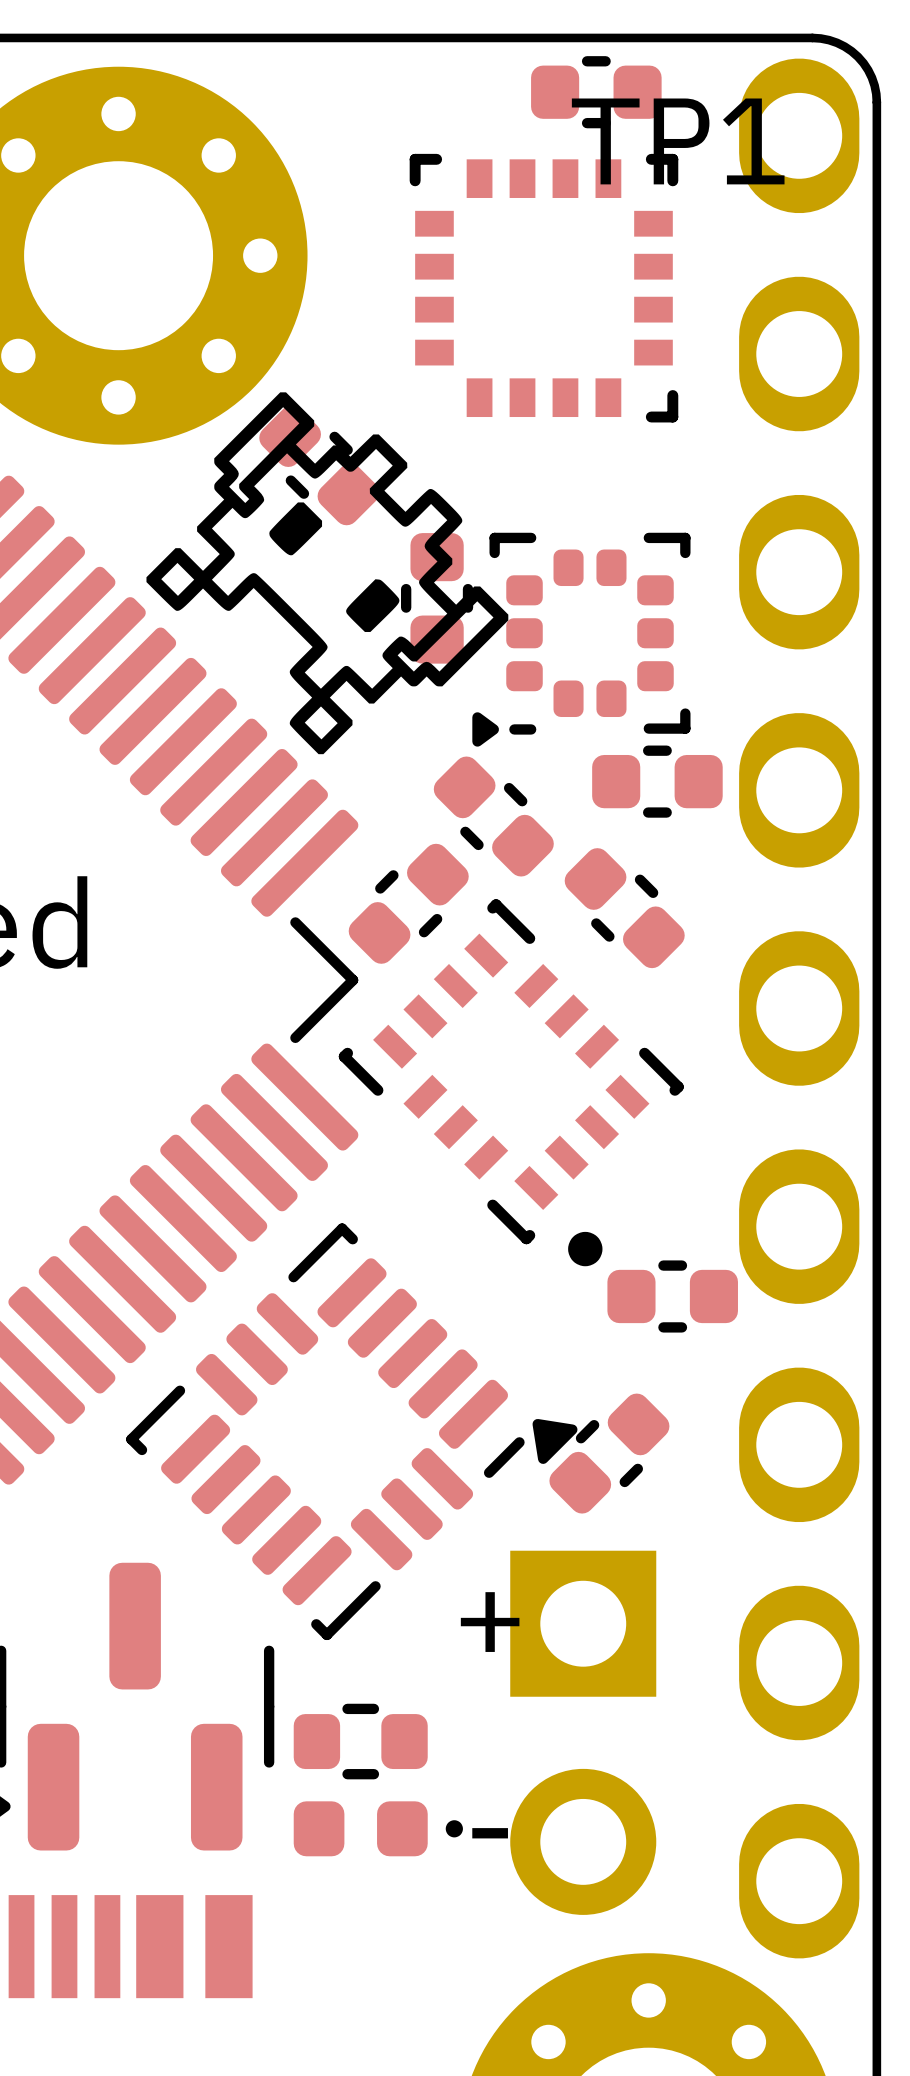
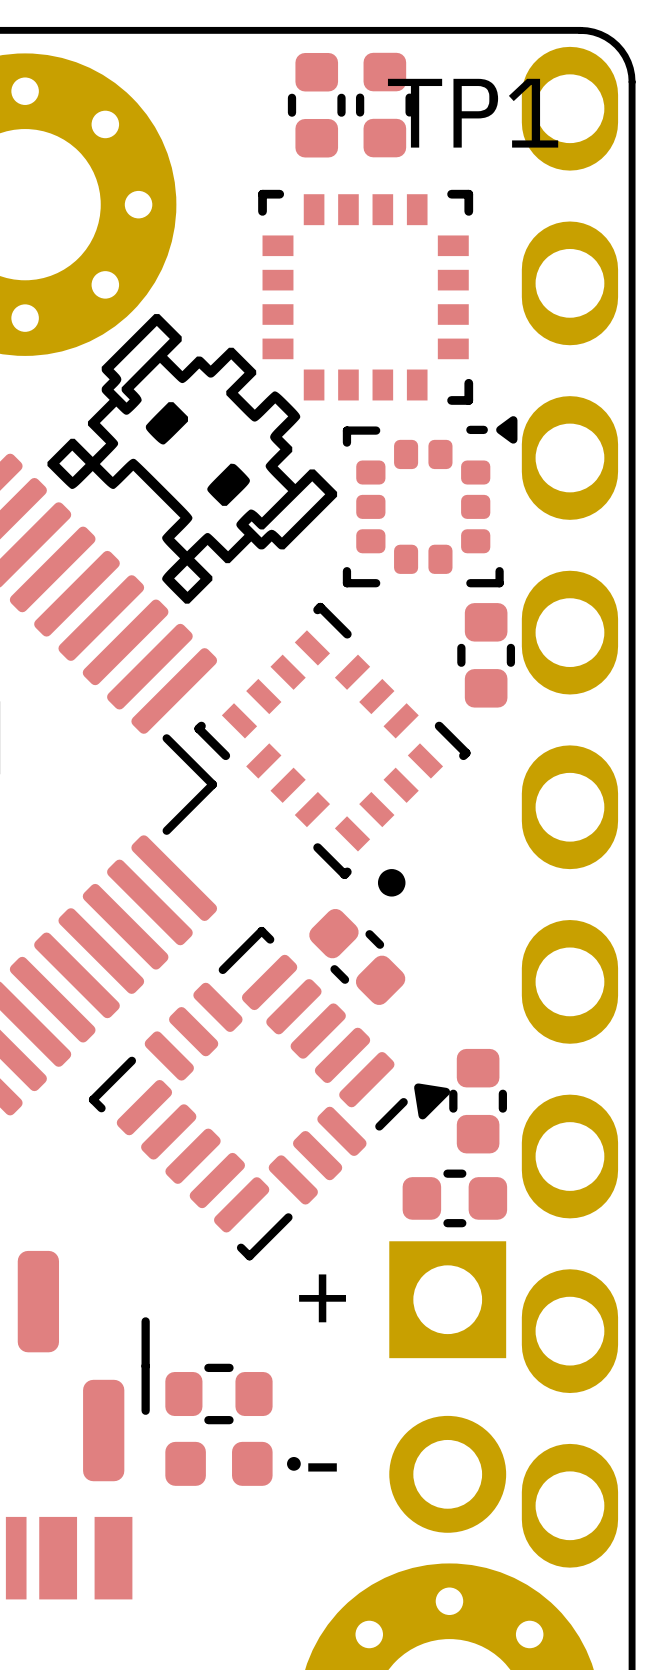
part rotation: 0° (596, 92) -> 90° clockwise (384, 105)
part: none -> (316, 105)
part position: (543, 288) -> (365, 297)
part: (319, 465) -> none
part: (437, 598) -> none
part rotation: 0° (581, 639) -> 180° (430, 501)
part rotation: 0° (657, 781) -> 90° clockwise (486, 655)
part: (493, 816) -> none
part: (408, 903) -> none
part: (624, 908) -> none
part position: (511, 1082) -> (332, 749)
part: none -> (357, 956)
part rotation: 0° (672, 1296) -> 90° clockwise (478, 1101)
part position: (672, 1296) -> (478, 1101)
part position: (351, 1431) -> (269, 1093)
part: (609, 1453) -> none
part: none -> (454, 1198)
part position: (583, 1732) -> (447, 1387)

